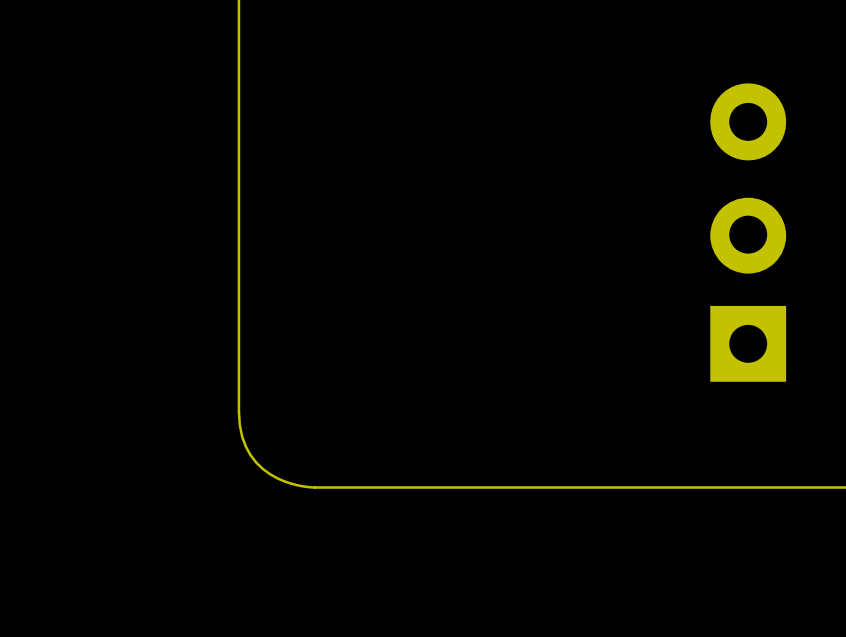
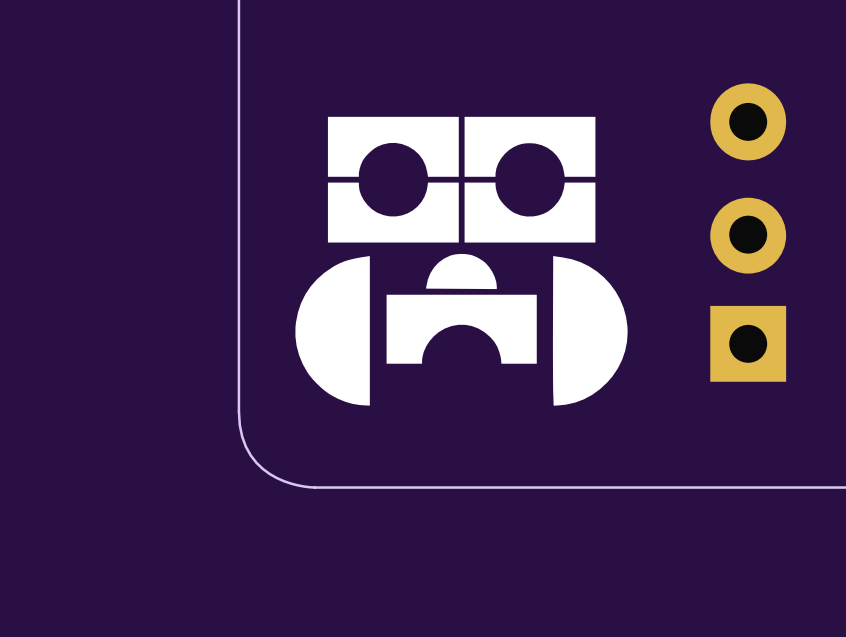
drawing: none -> [295, 116, 628, 406]

